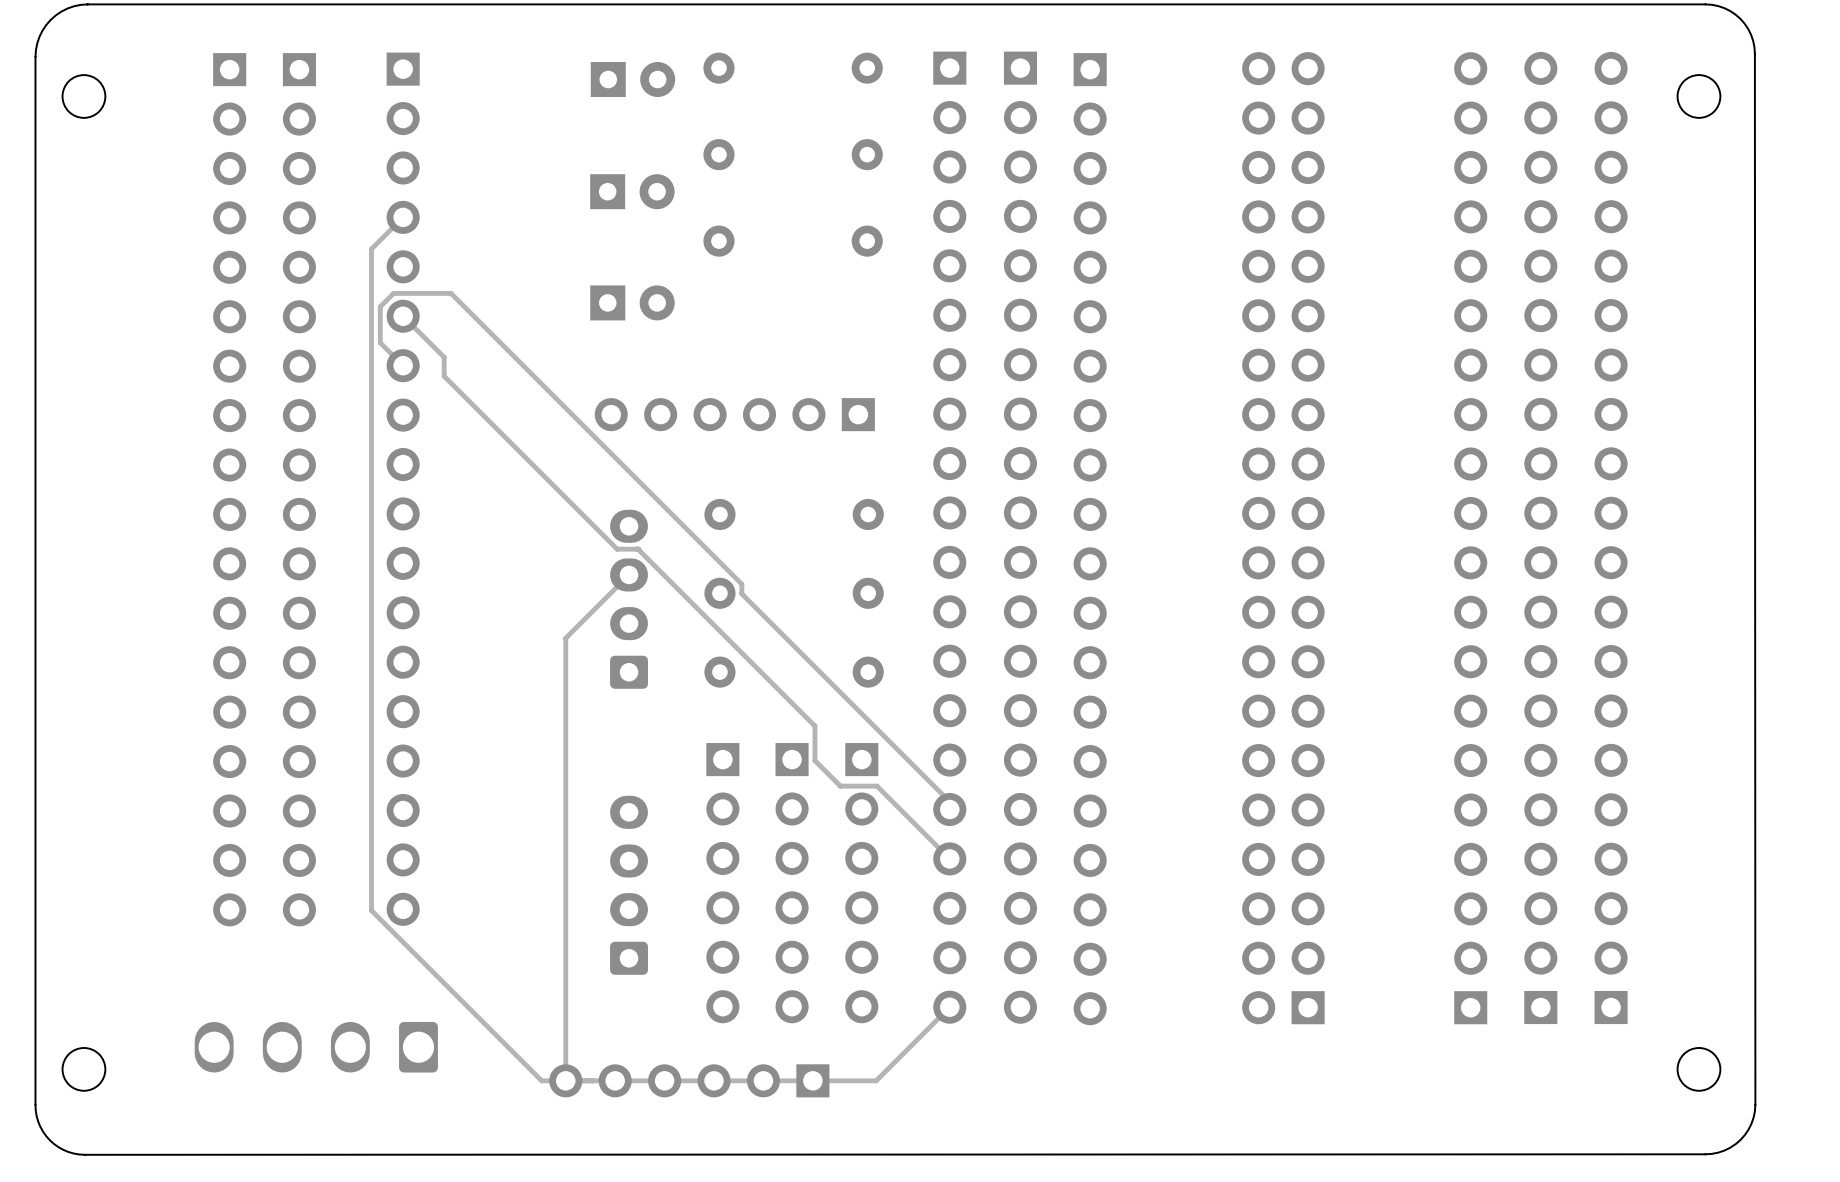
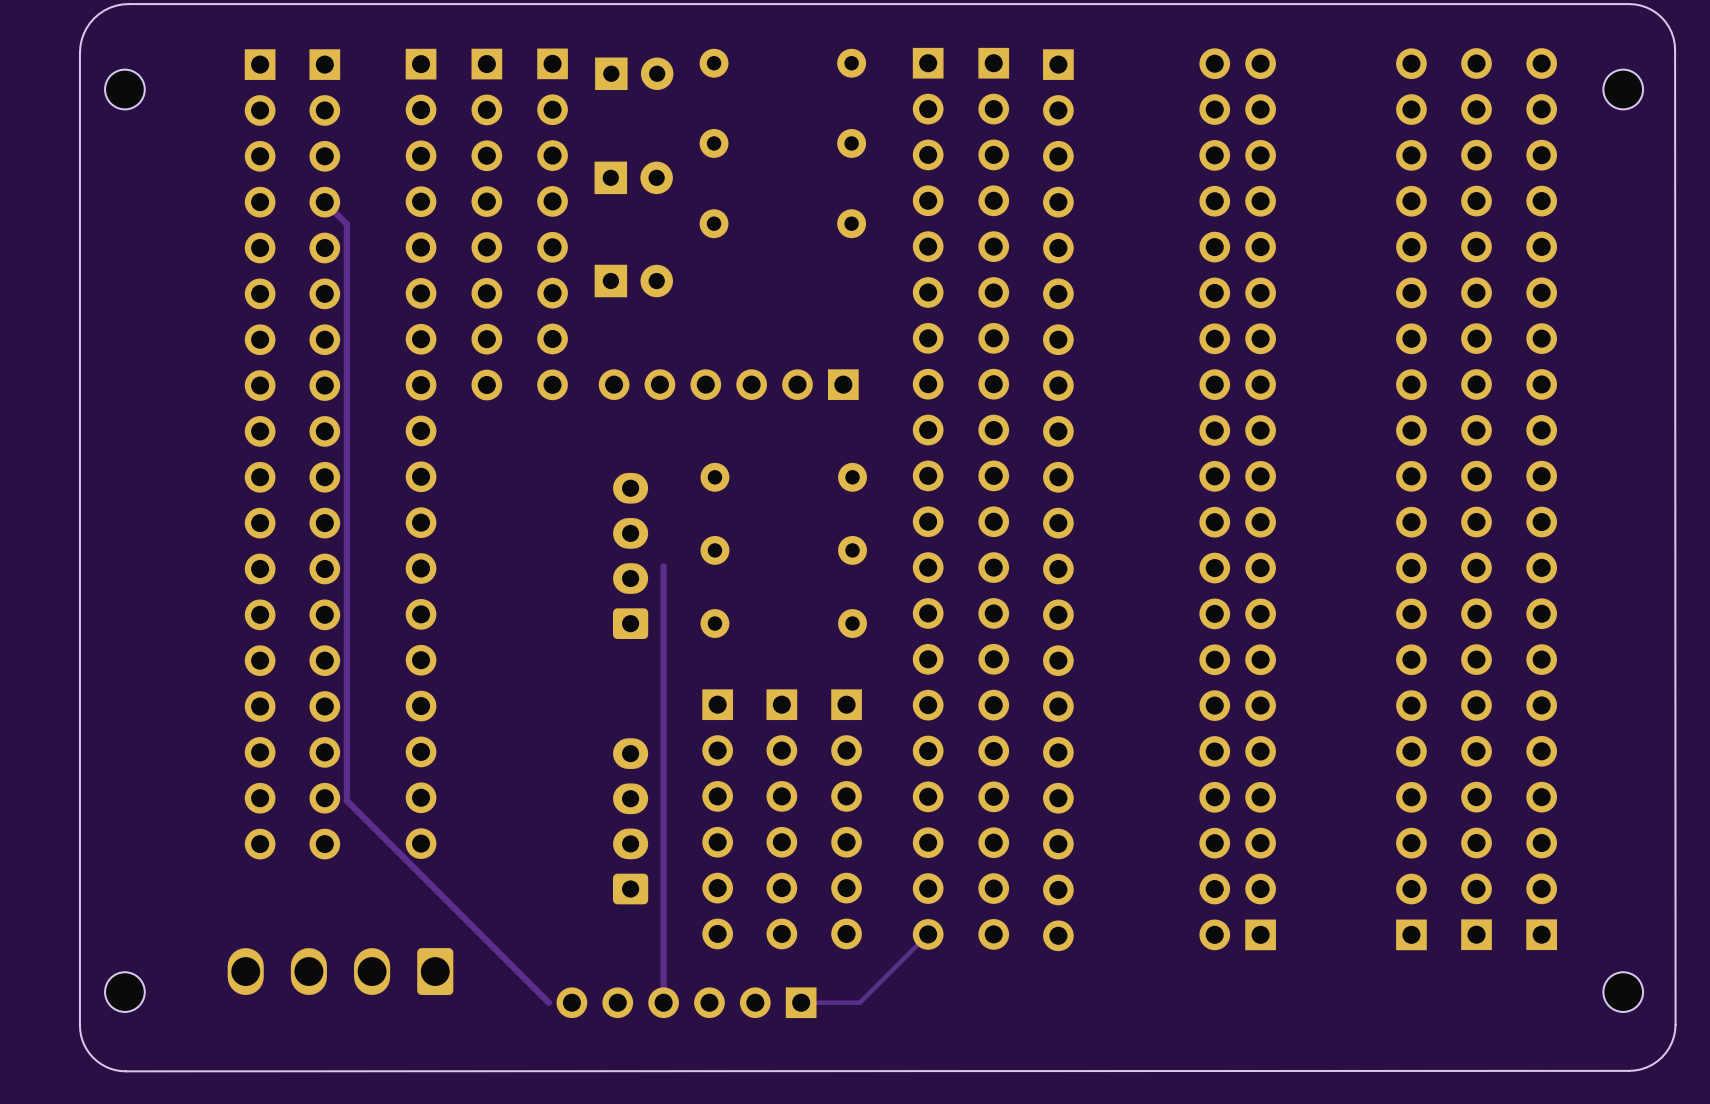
track: none -> (324, 202) (346, 224) (346, 800) (548, 1002)
track: (403, 217) (371, 249) (371, 910) (541, 1080) (812, 1080) -> none
part: none -> (552, 224)
part: none -> (486, 224)
track: (403, 316) (444, 357) (444, 376) (617, 549) (639, 549) -> none
track: (403, 365) (380, 342) (380, 306) (393, 293) (451, 293) (741, 584) (741, 593) (949, 801) -> none
track: (638, 549) (814, 726) (814, 760) (840, 786) (877, 786) (949, 858) -> none
track: (629, 574) (565, 638) (565, 1080) -> none
track: none -> (663, 566) (663, 1002)

